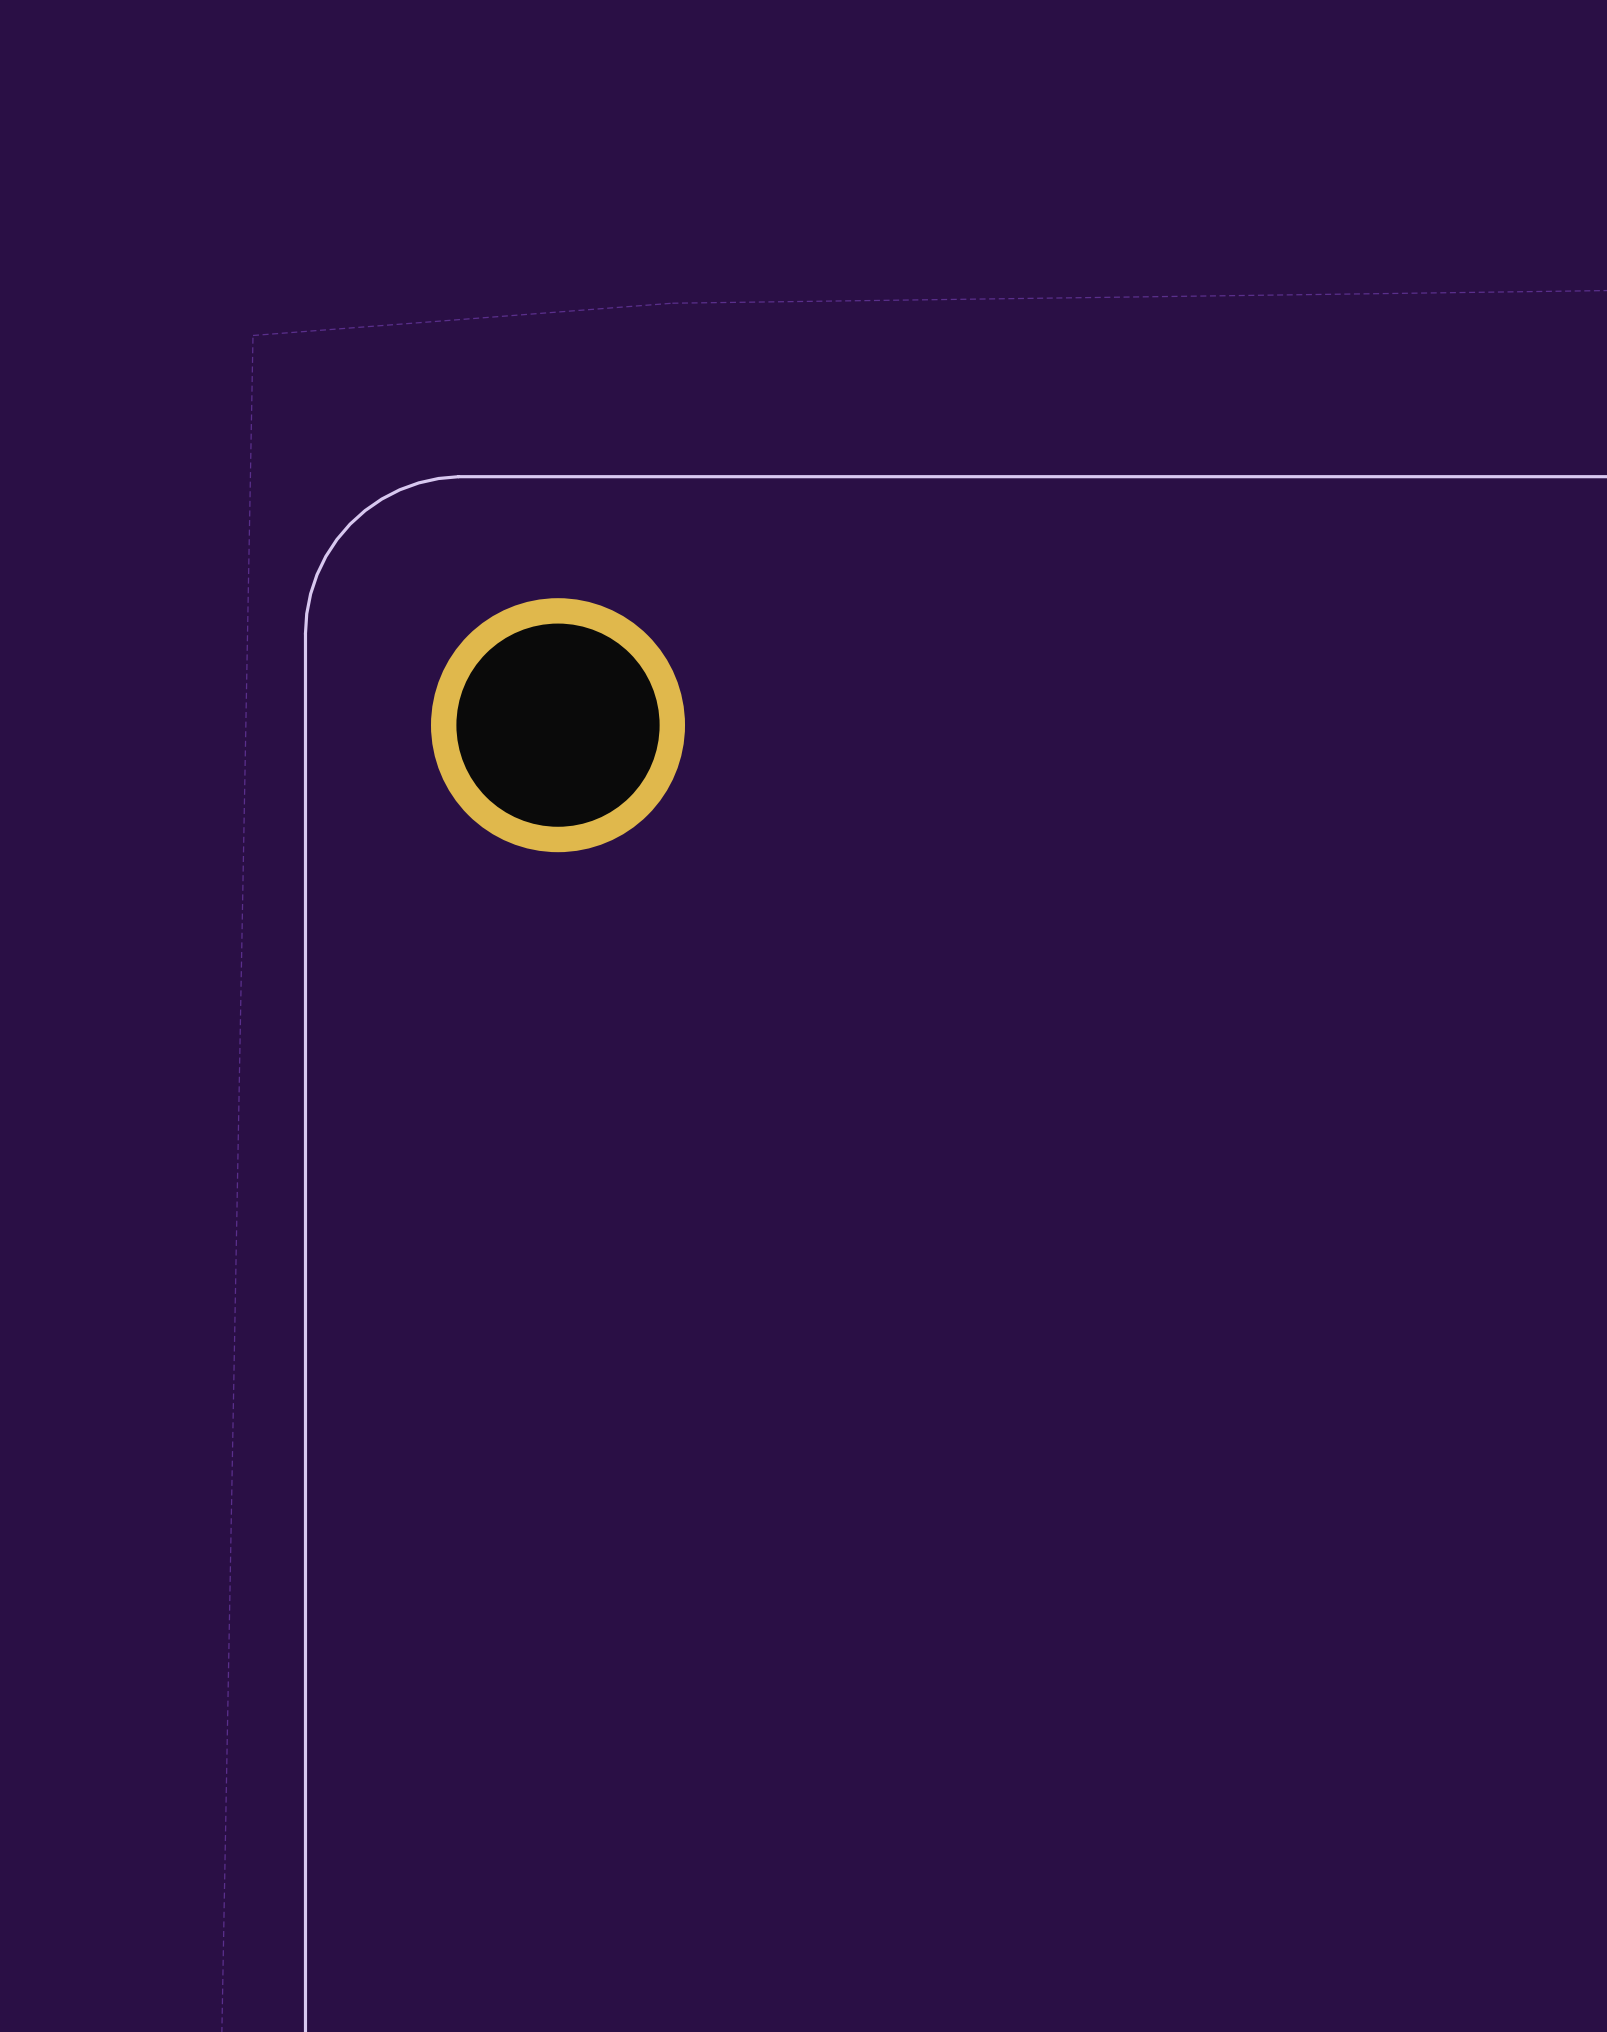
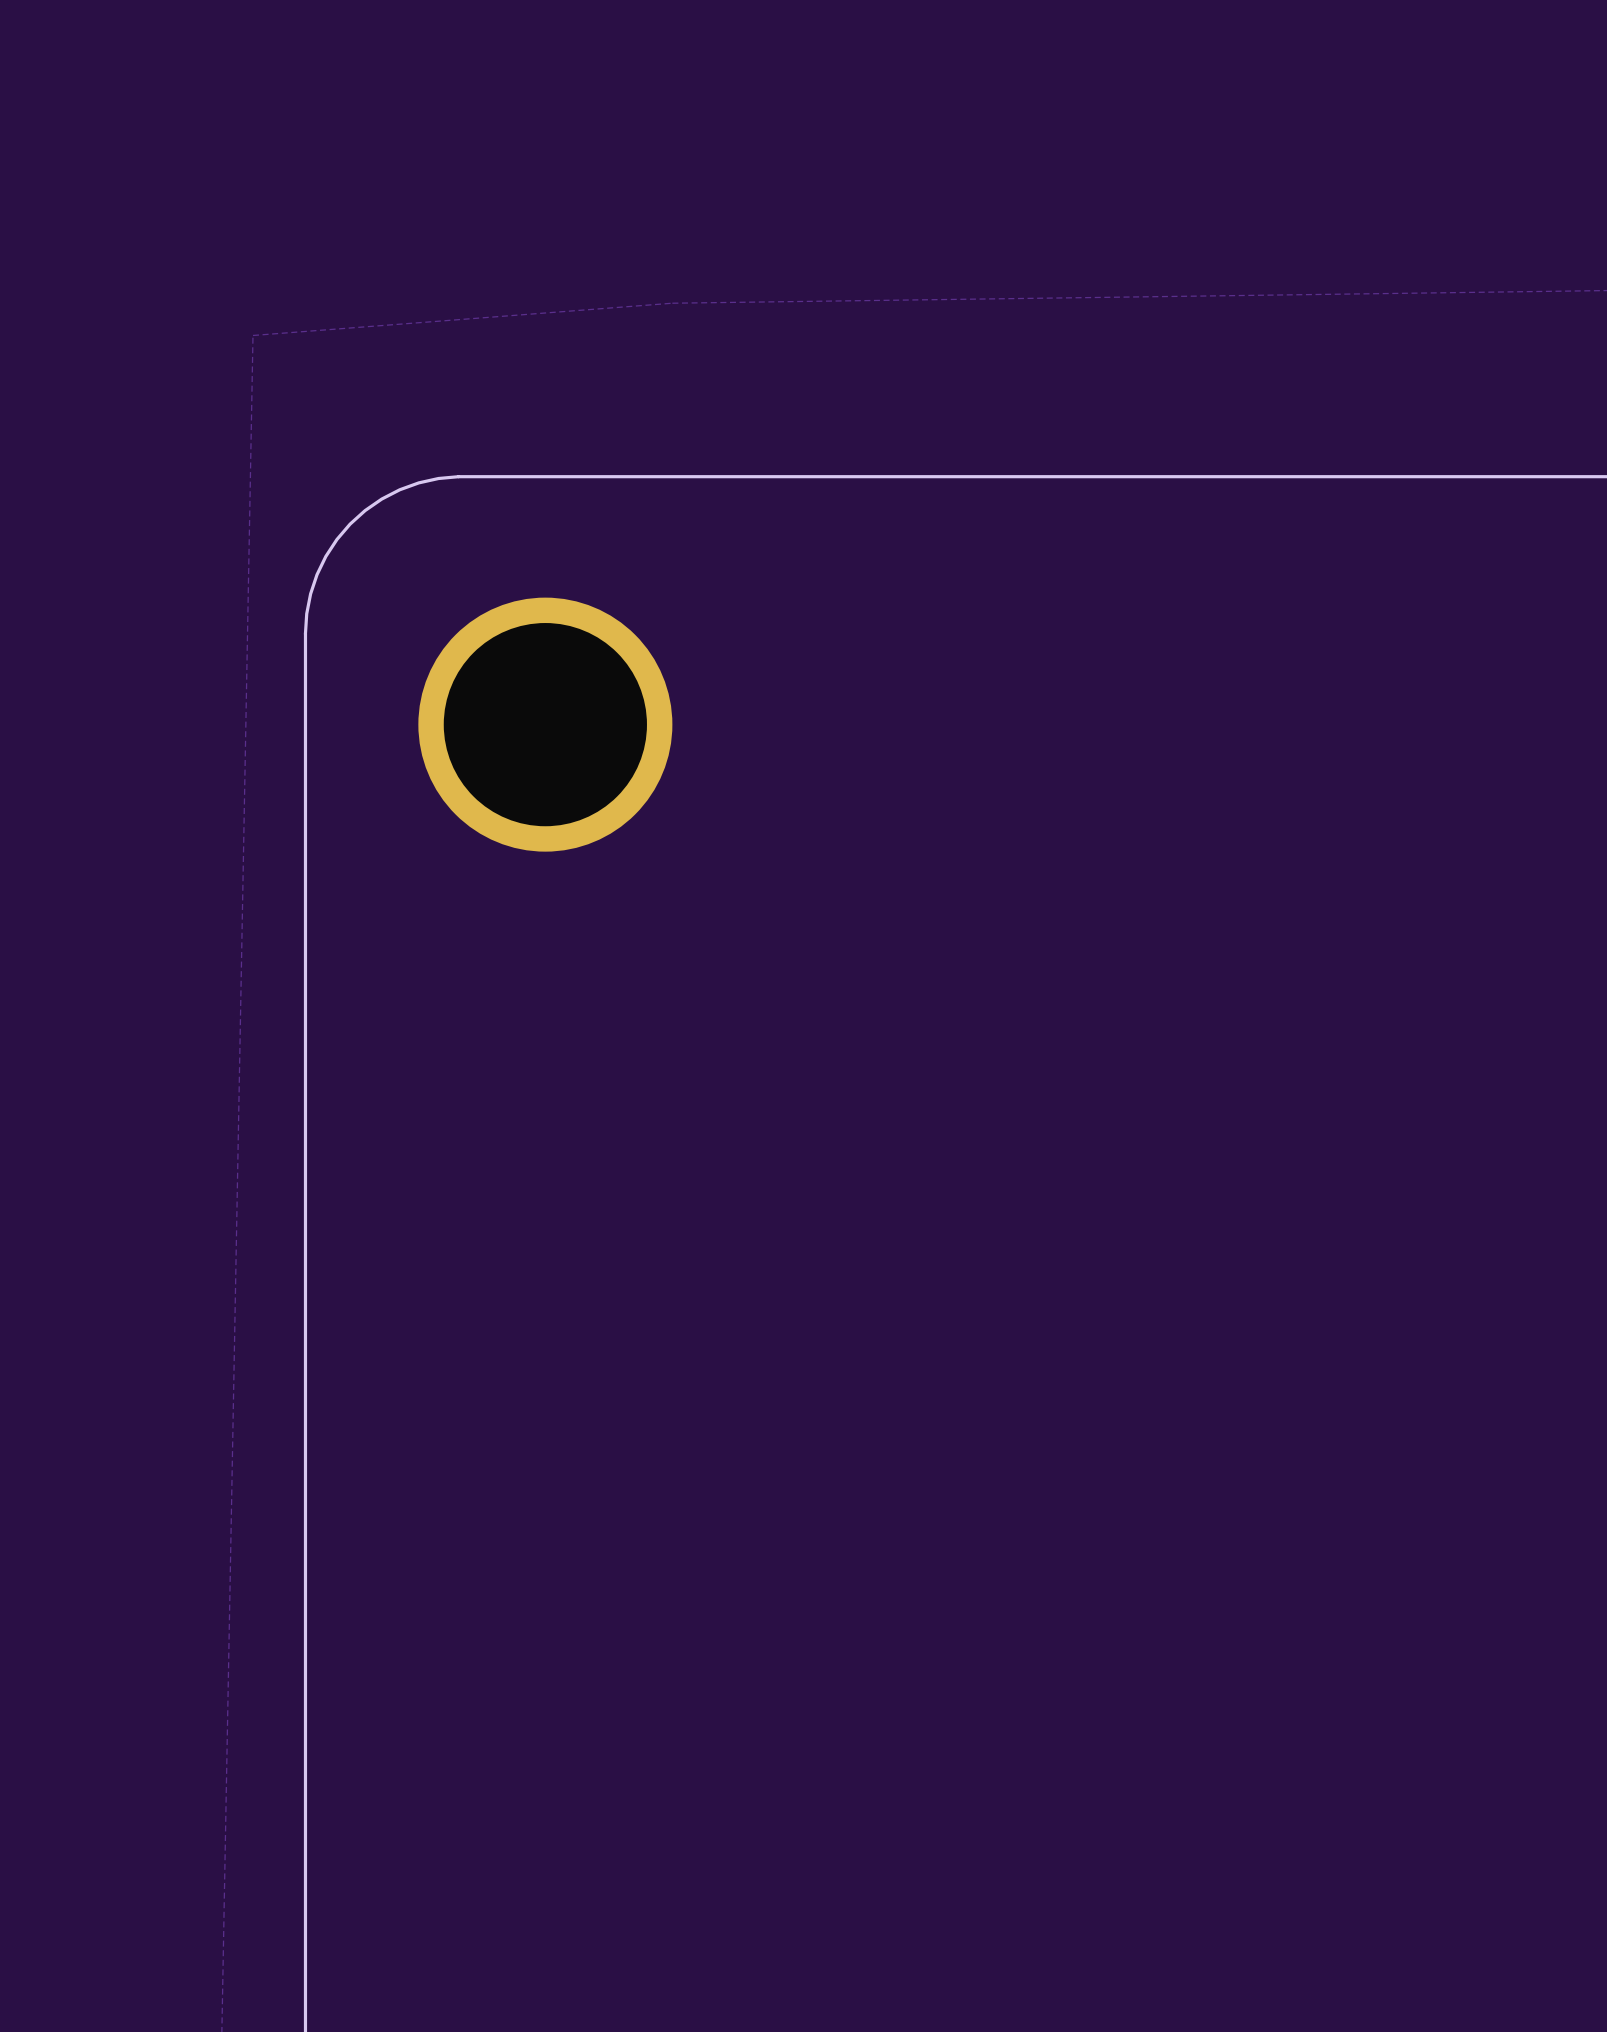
part position: (558, 725) -> (545, 724)

